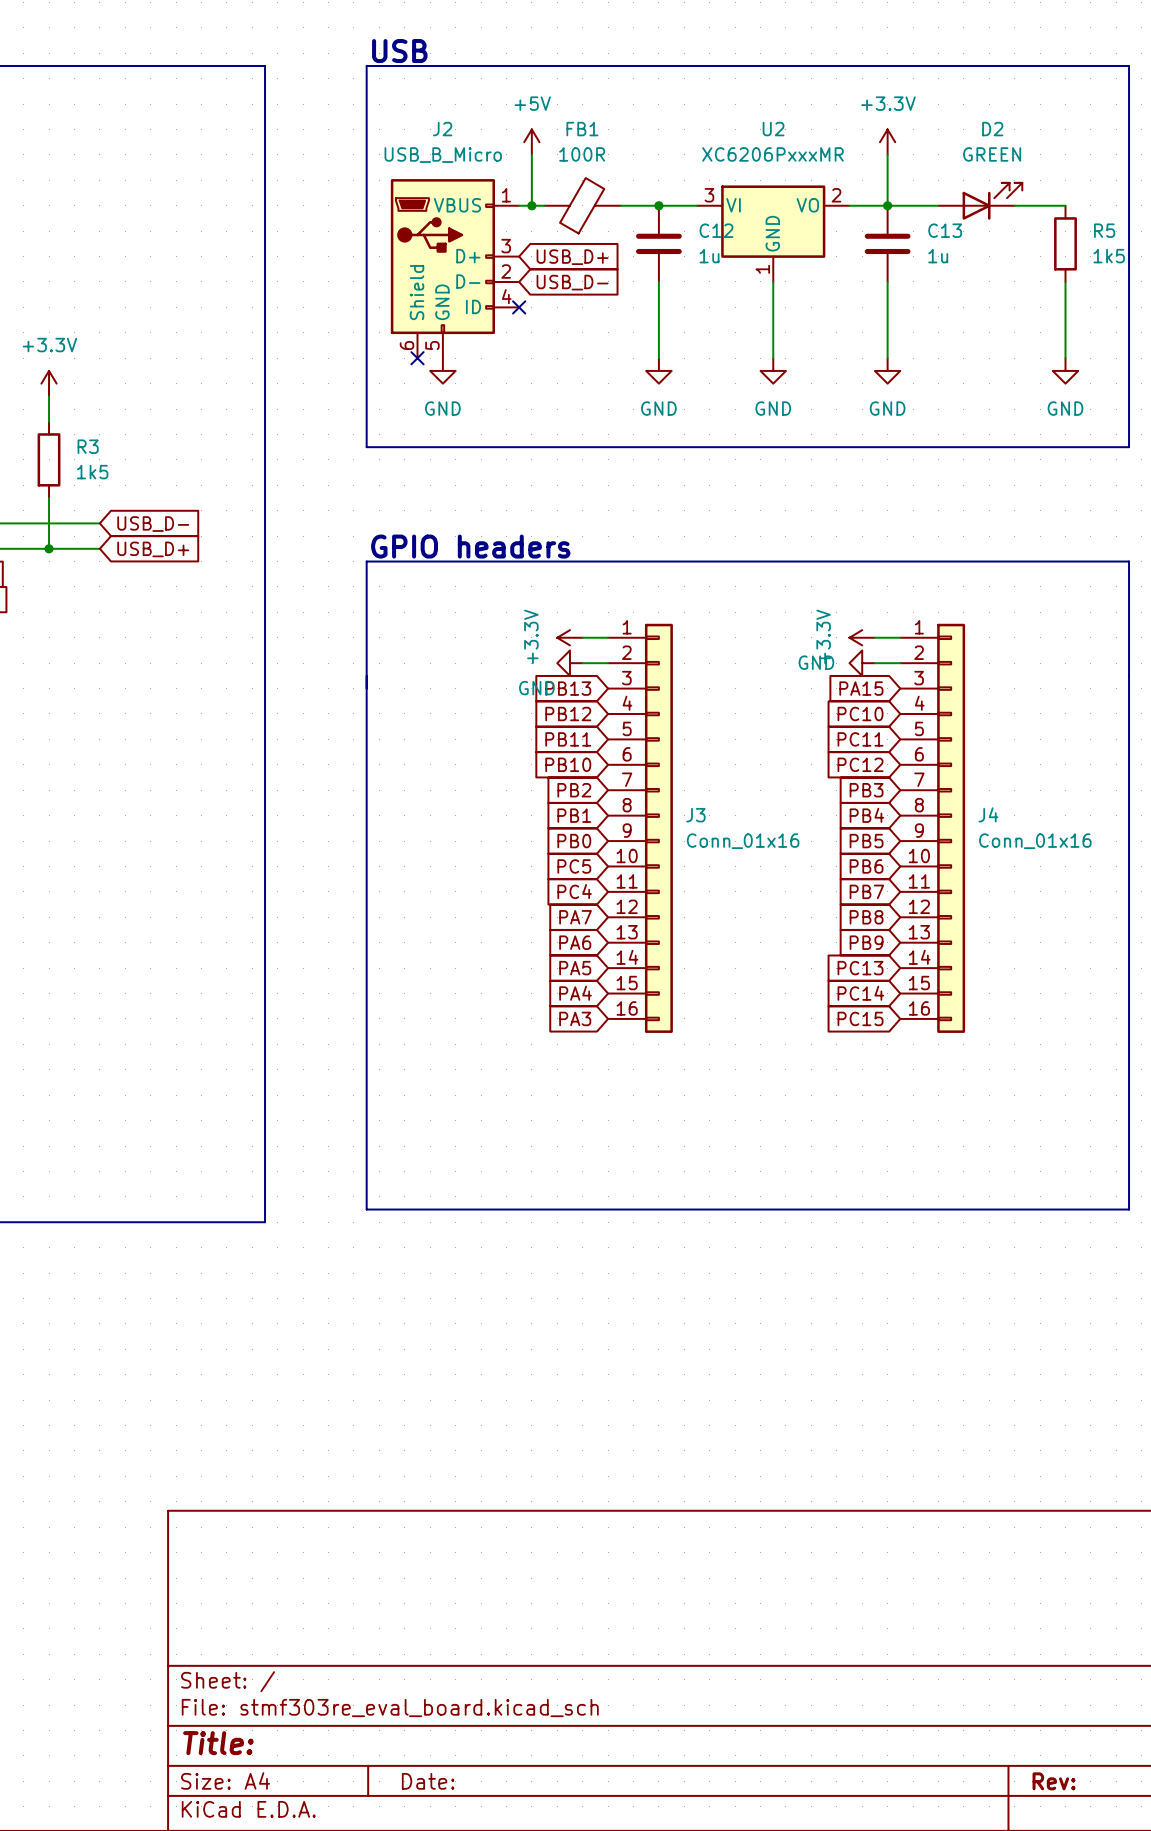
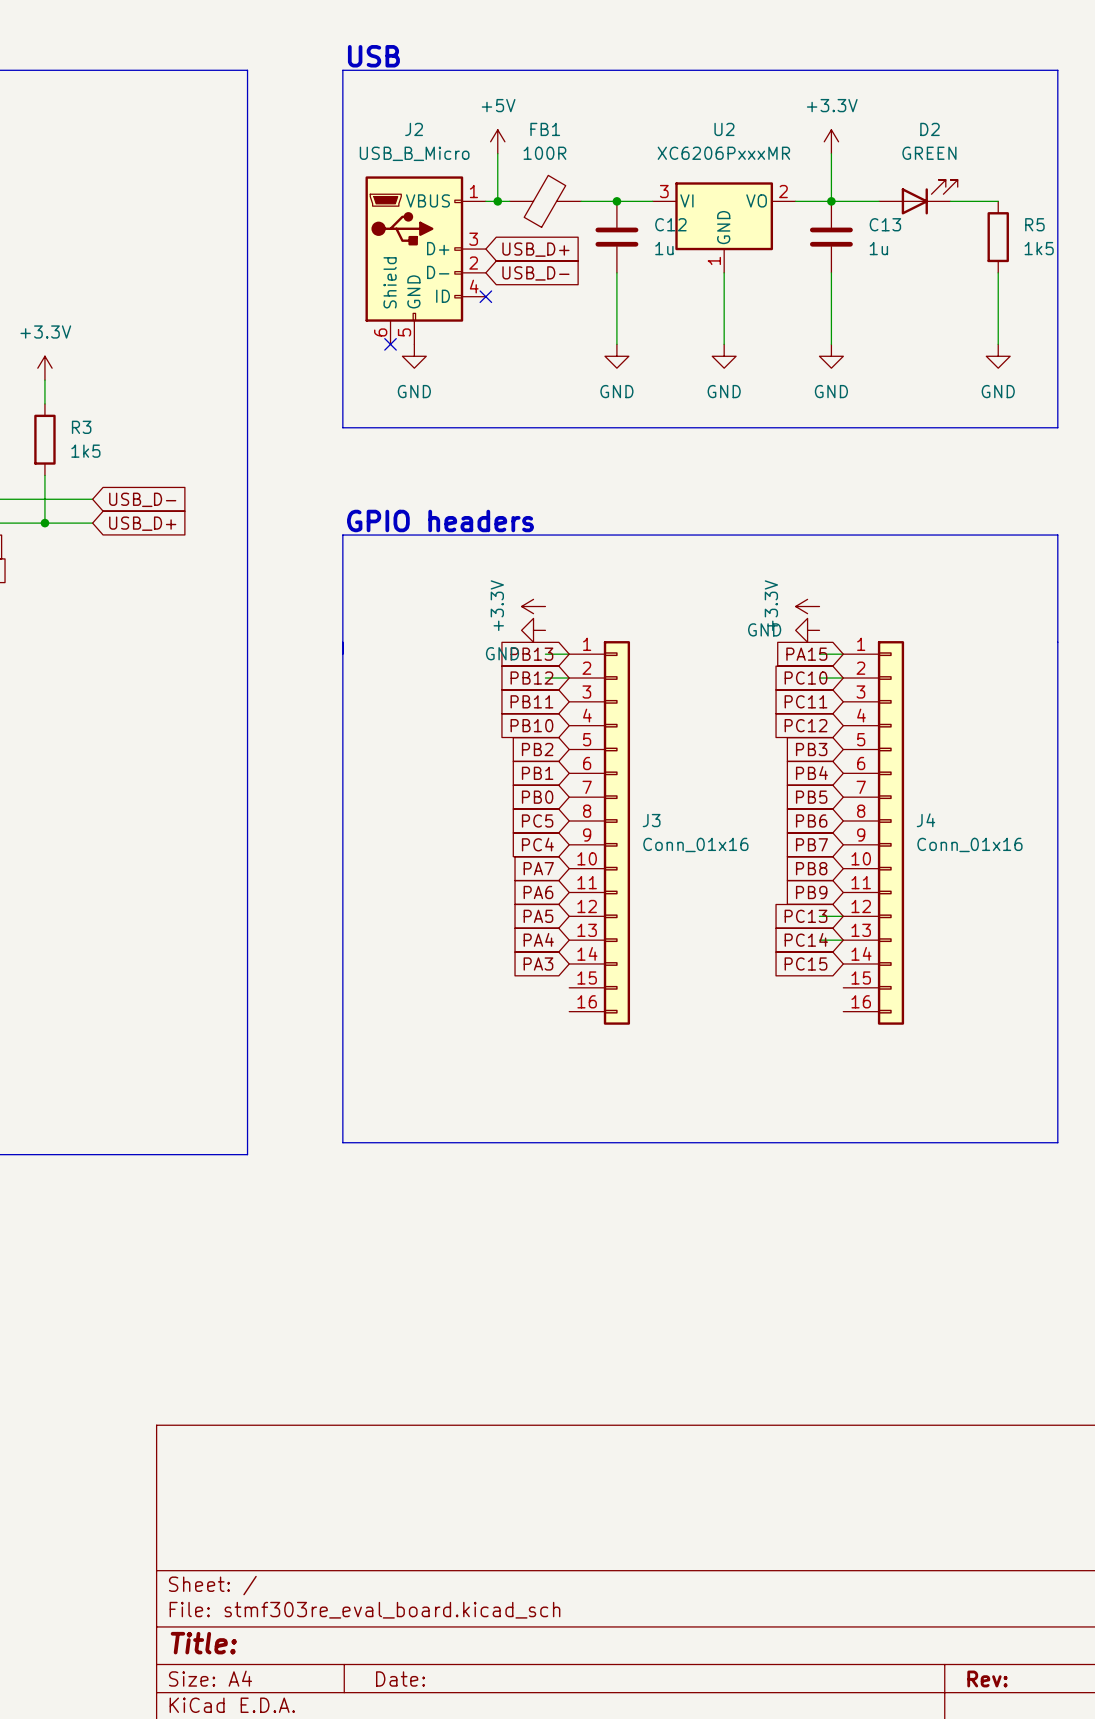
wire: (582, 637) (608, 637) -> (545, 654) (569, 654)
wire: (874, 637) (900, 637) -> (819, 654) (843, 654)
wire: (582, 663) (608, 663) -> (545, 678) (569, 678)
wire: (874, 663) (900, 663) -> (819, 678) (843, 678)
J3 position: (640, 828) -> (599, 832)
J4 position: (932, 828) -> (873, 832)
wire: none -> (819, 916) (843, 916)
wire: none -> (819, 940) (843, 940)

